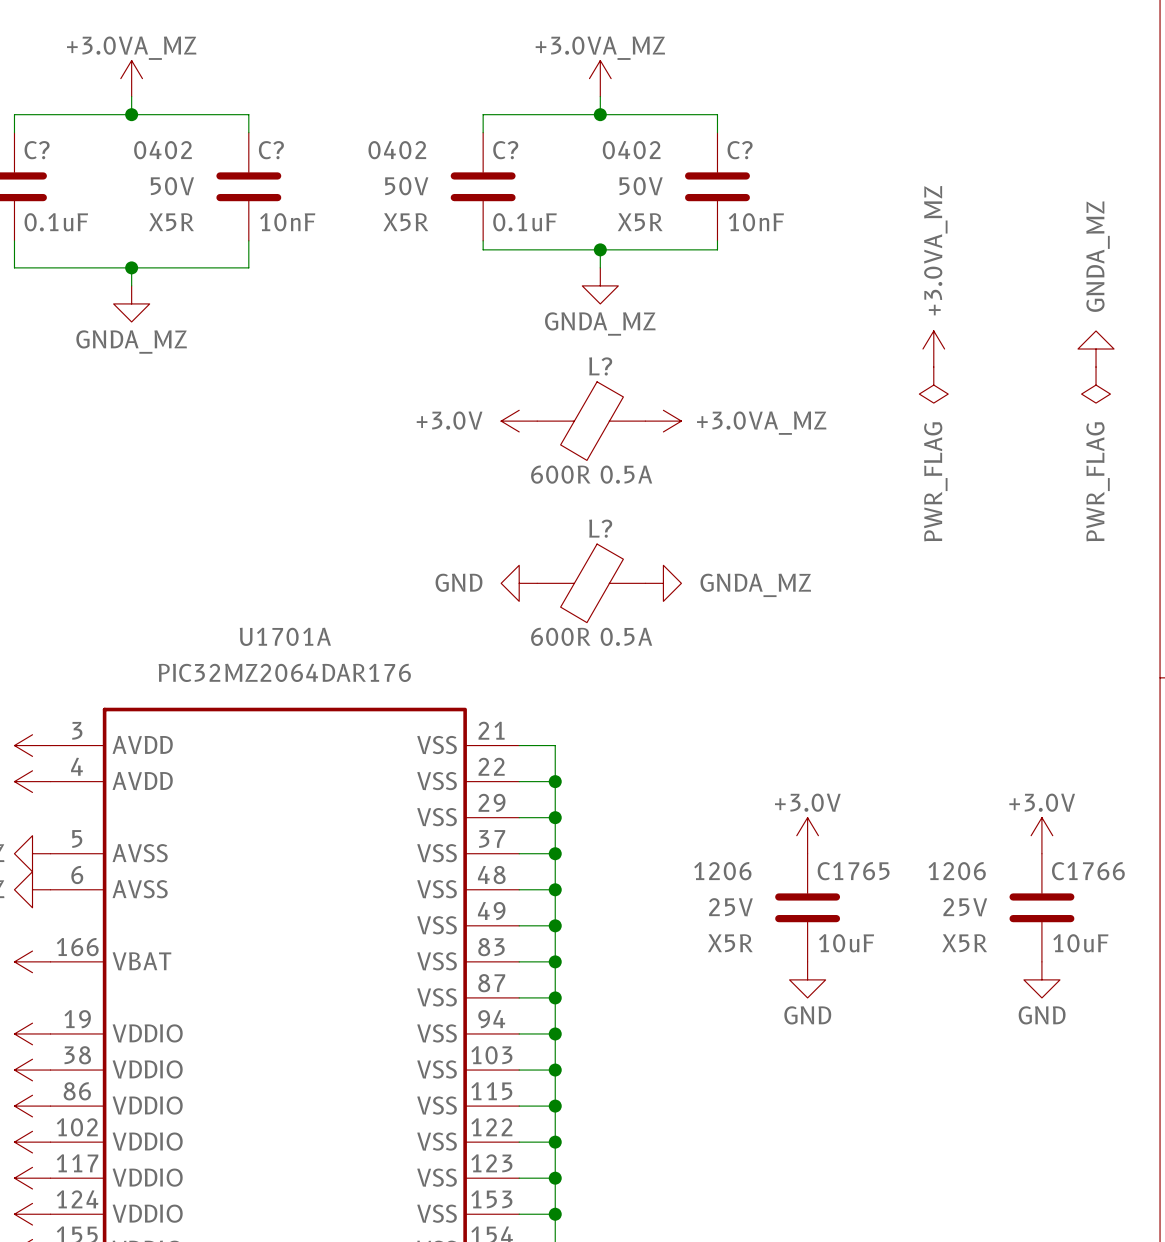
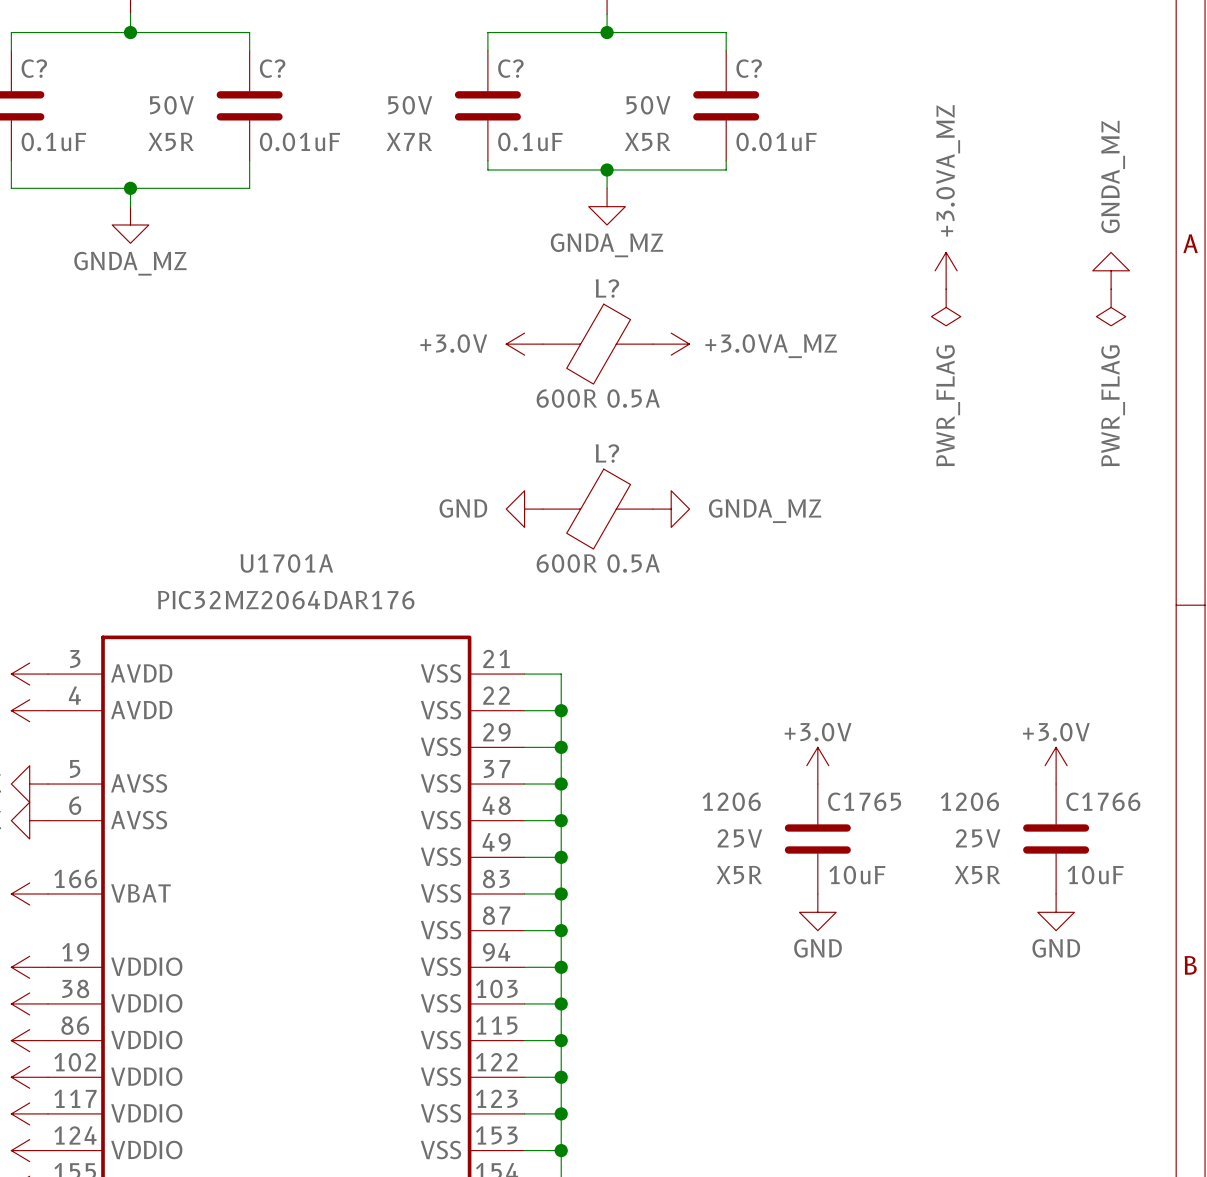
C? text: 0402 (162, 150) -> none
C? text: 0402 (397, 150) -> none
C? text: 0402 (631, 150) -> none
C? value: 10nF (287, 222) -> 0.01uF (300, 141)
C? text: X5R (405, 222) -> X7R (409, 141)
C? value: 10nF (756, 222) -> 0.01uF (776, 141)

